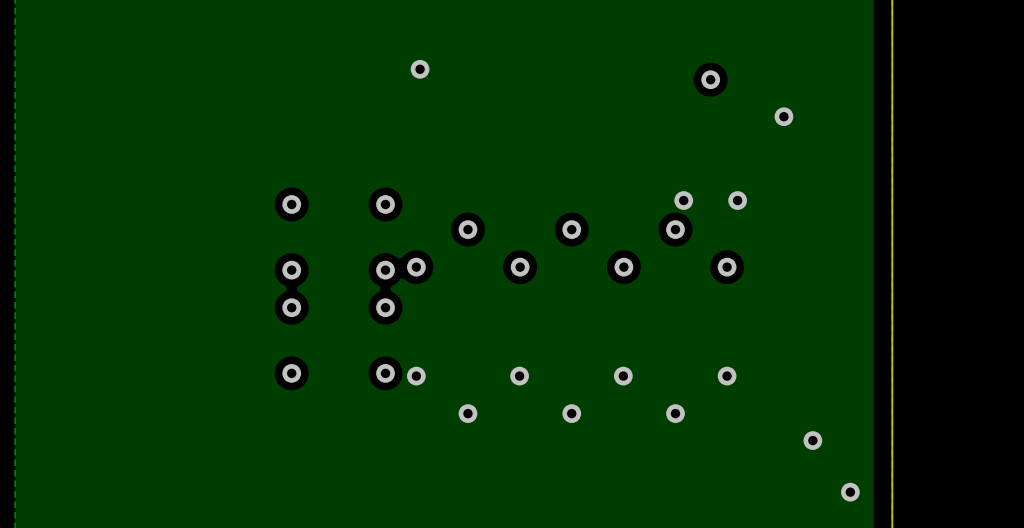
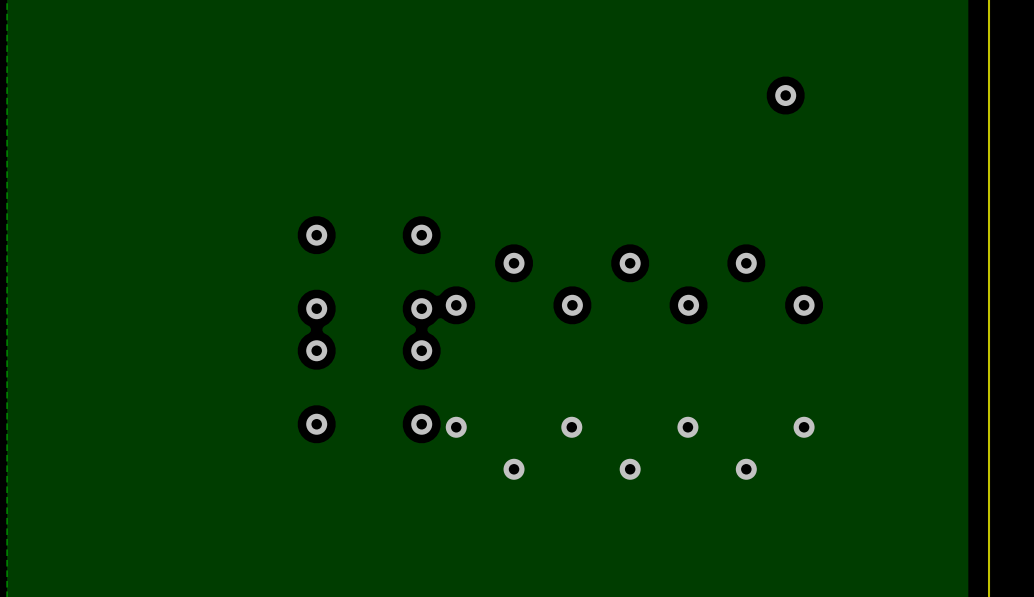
via: (420, 69) -> none
via: (783, 116) -> none
via: (683, 200) -> none
via: (737, 200) -> none
via: (812, 440) -> none
via: (850, 492) -> none

